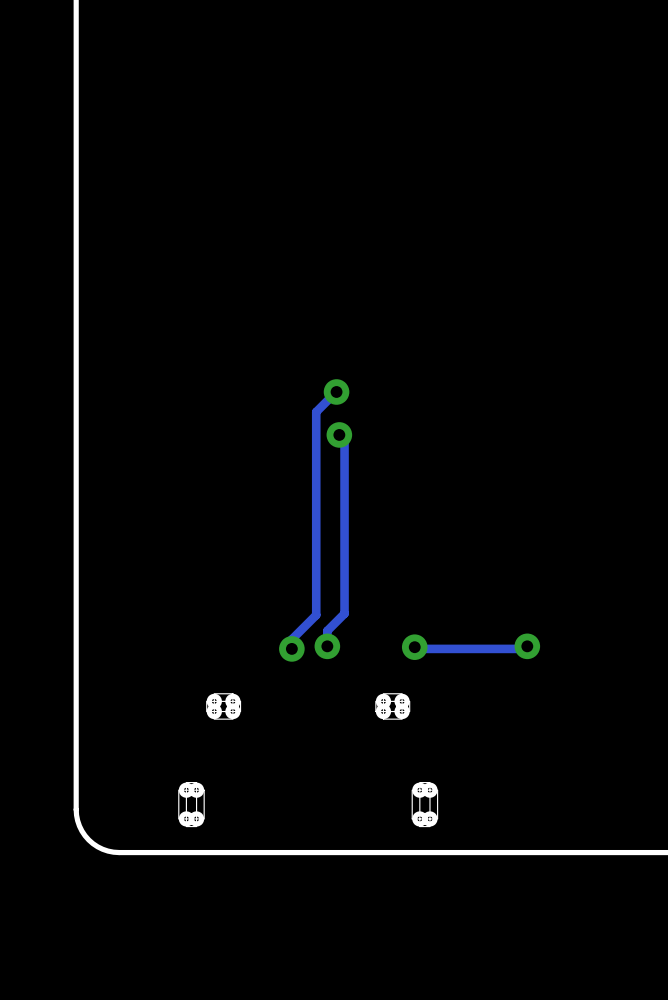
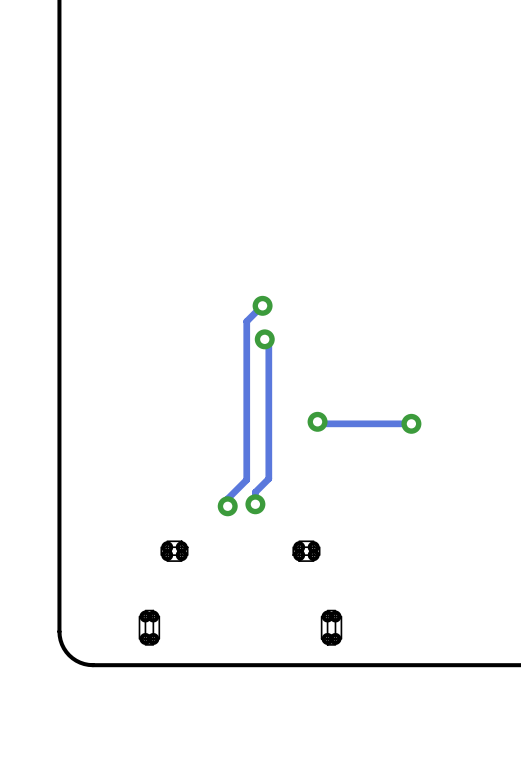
track: none -> (317, 421) (319, 423) (411, 423)
via: none -> (317, 421)
via: none -> (411, 423)
track: (527, 646) (524, 648) (416, 648) (414, 647) -> none
via: (527, 646) -> none
via: (414, 647) -> none

